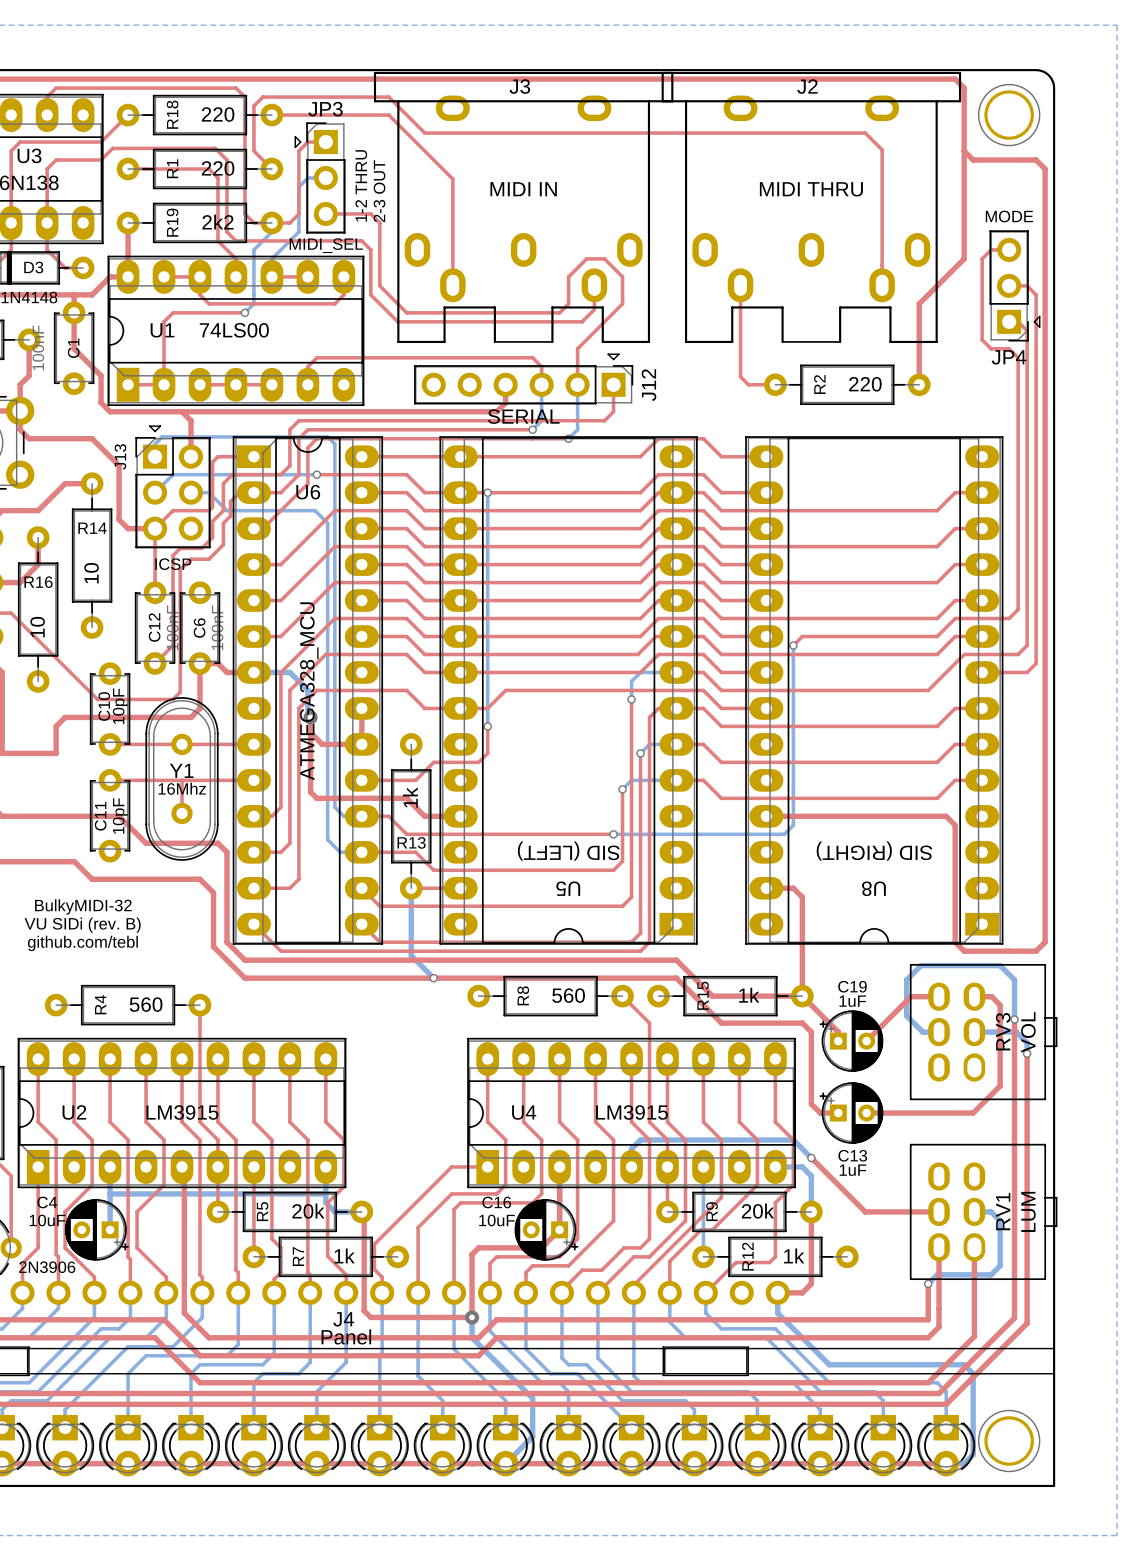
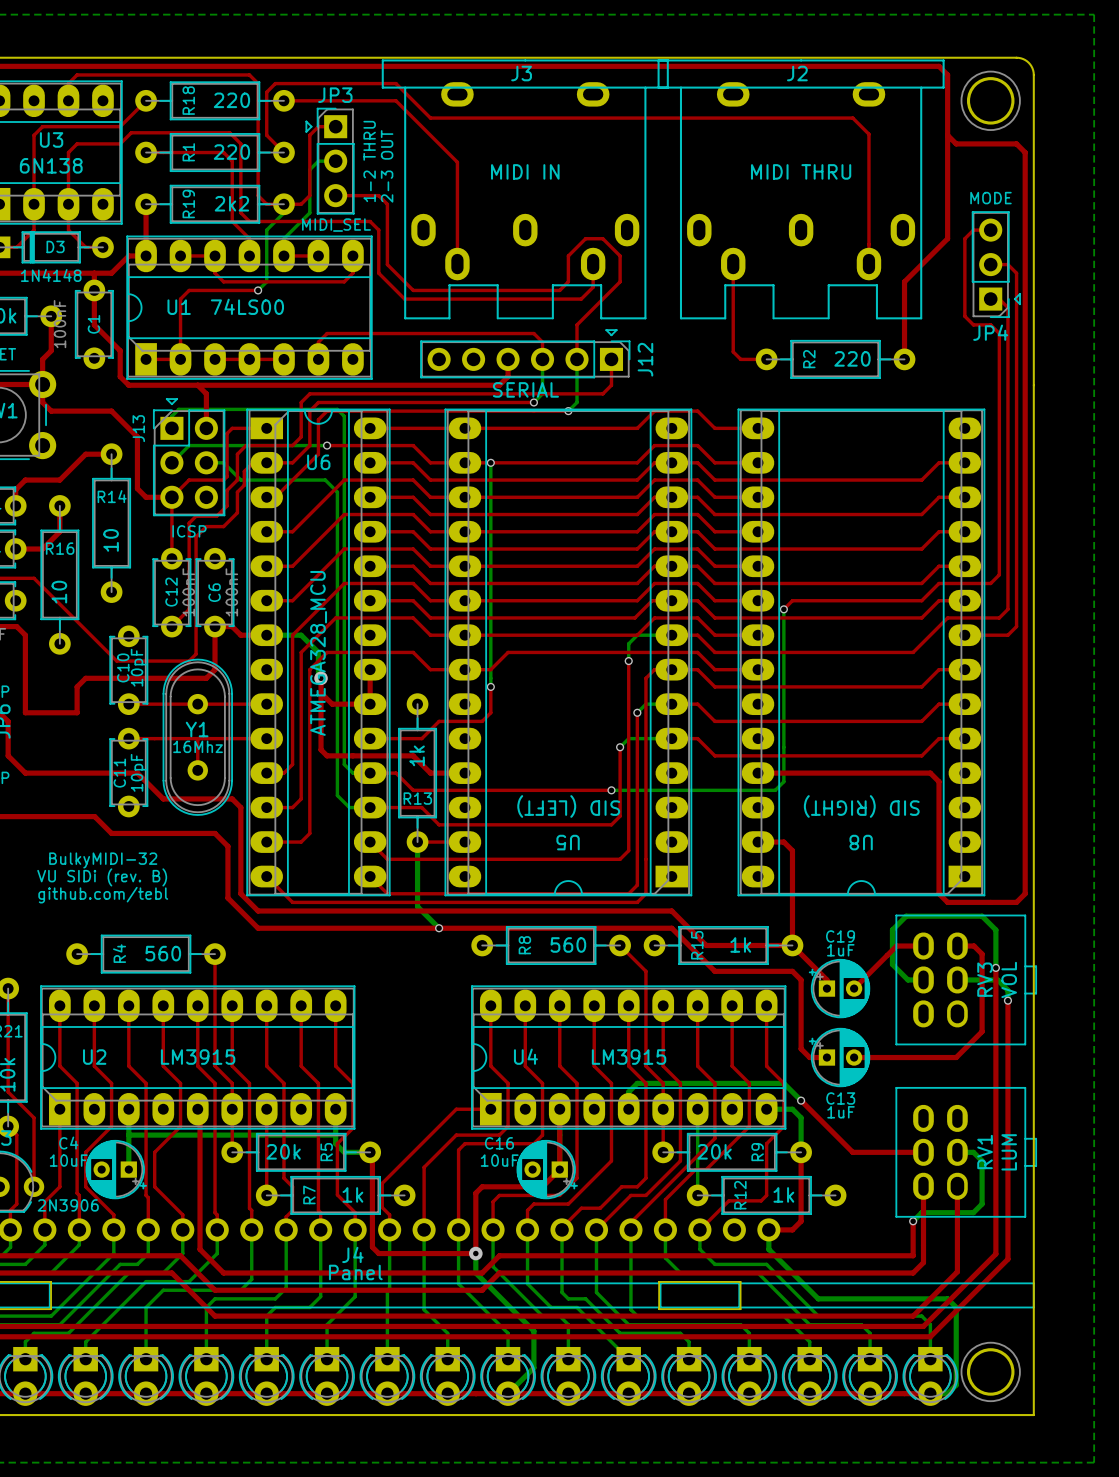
R5 name position: R5 (262, 1211) -> R5 (326, 1152)
R5 value position: 20k (308, 1211) -> 20k (283, 1151)
R9 name position: R9 (712, 1211) -> R9 (757, 1152)
R9 value position: 20k (757, 1211) -> 20k (714, 1151)

